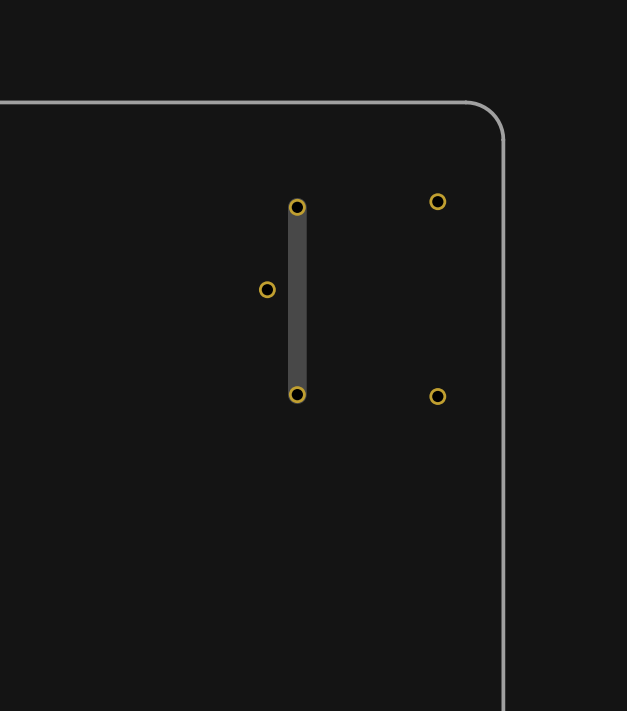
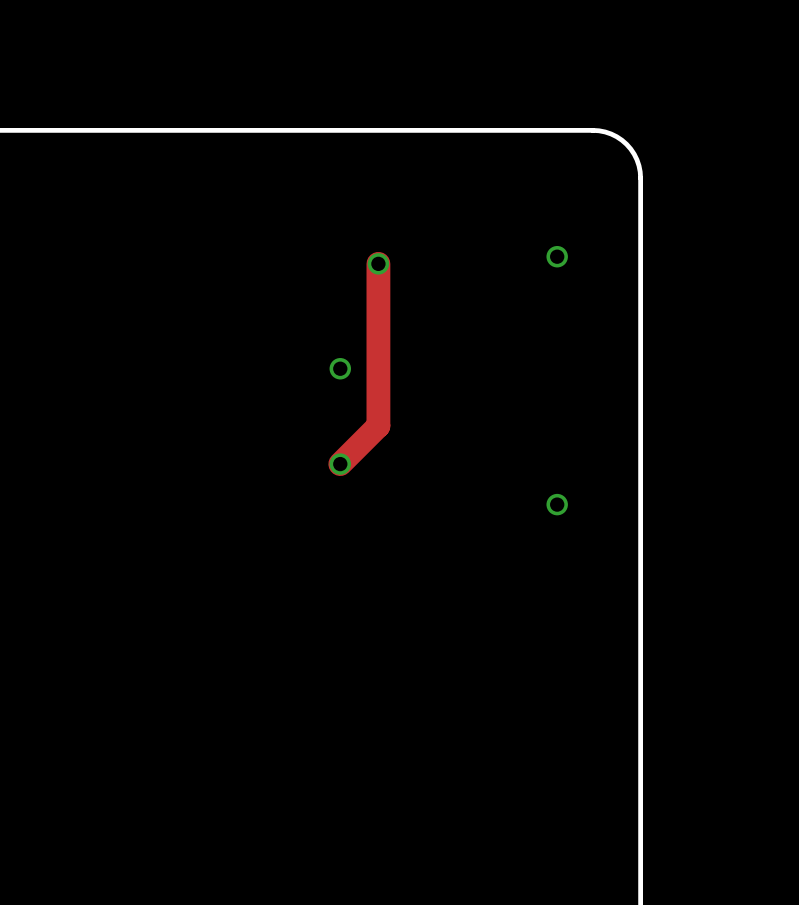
track: (297, 334) (297, 394) -> (378, 425) (340, 464)
via position: (297, 394) -> (340, 464)

